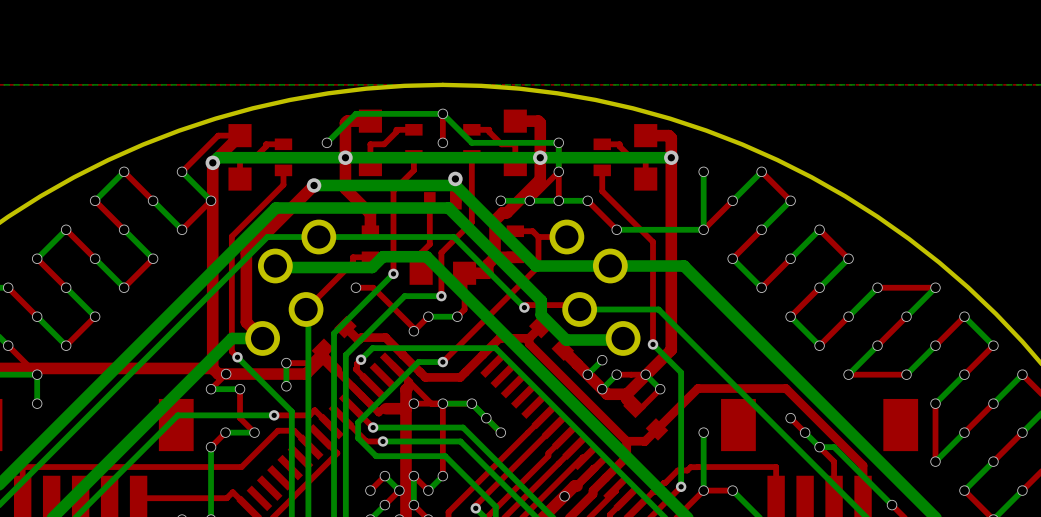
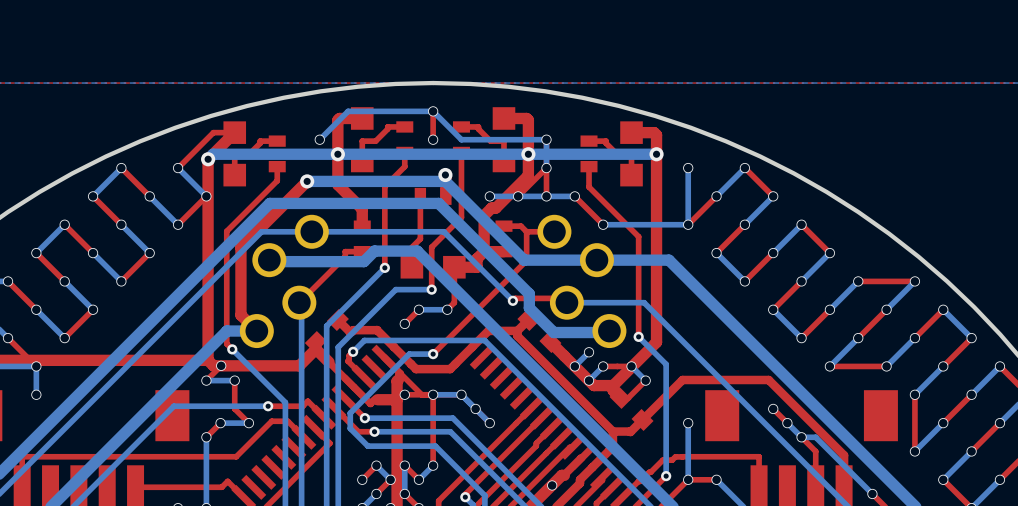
top track: (355, 287) (373, 287) (413, 328) (413, 331) -> none
via: (355, 287) -> none
top track: (322, 349) (309, 363) (286, 363) -> none
bottom track: (286, 363) (286, 386) -> none
via: (286, 363) -> none
via: (286, 386) -> none

